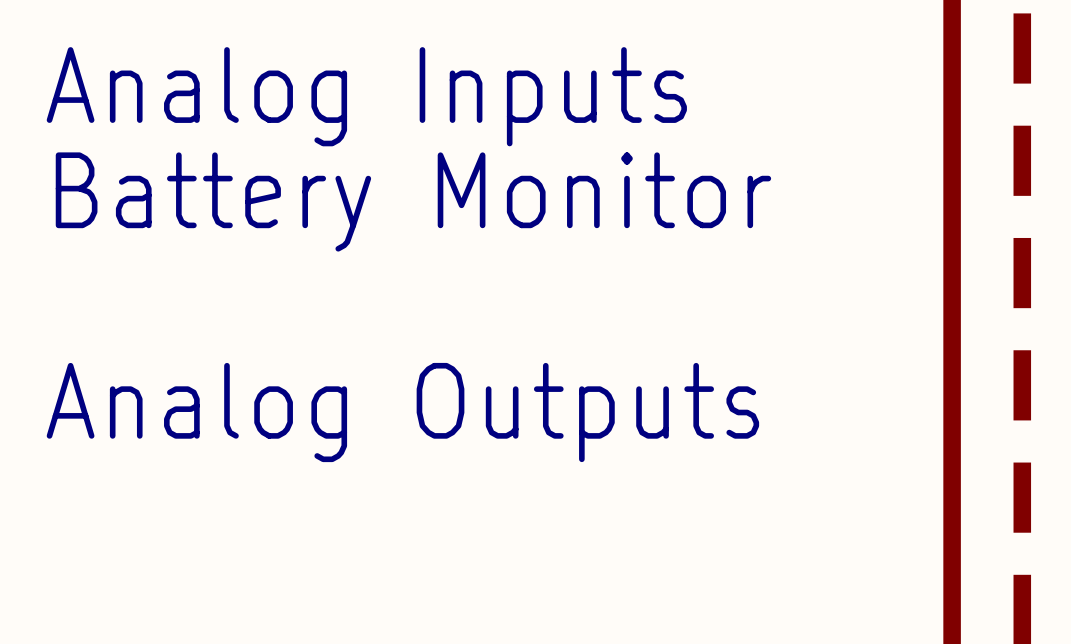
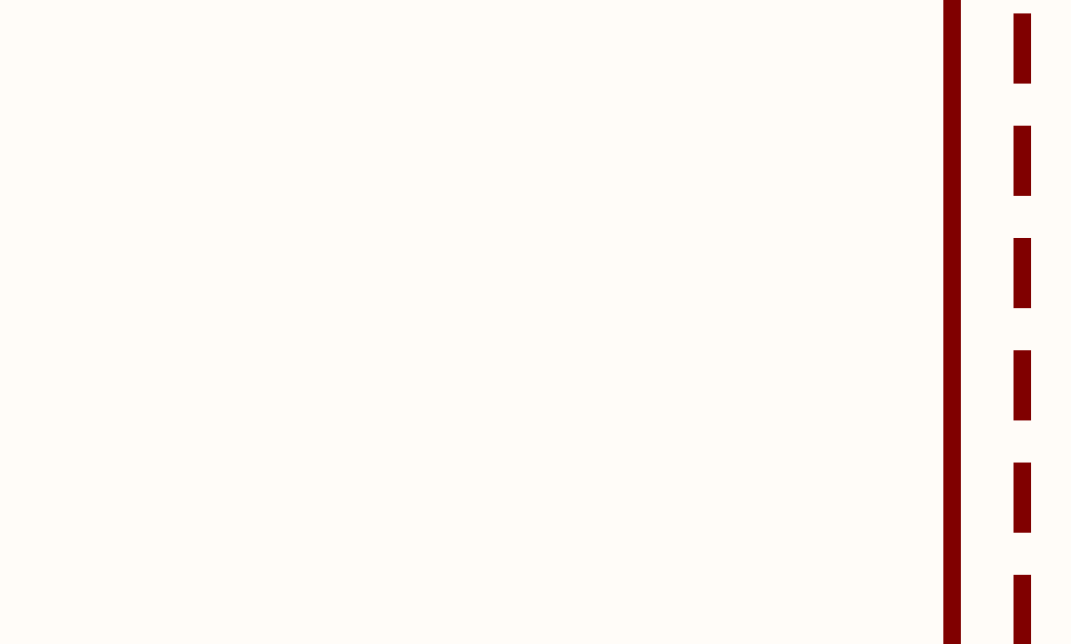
text: Analog Inputs (366, 96) -> none
text: Battery Monitor (413, 201) -> none
text: Analog Outputs (402, 412) -> none

